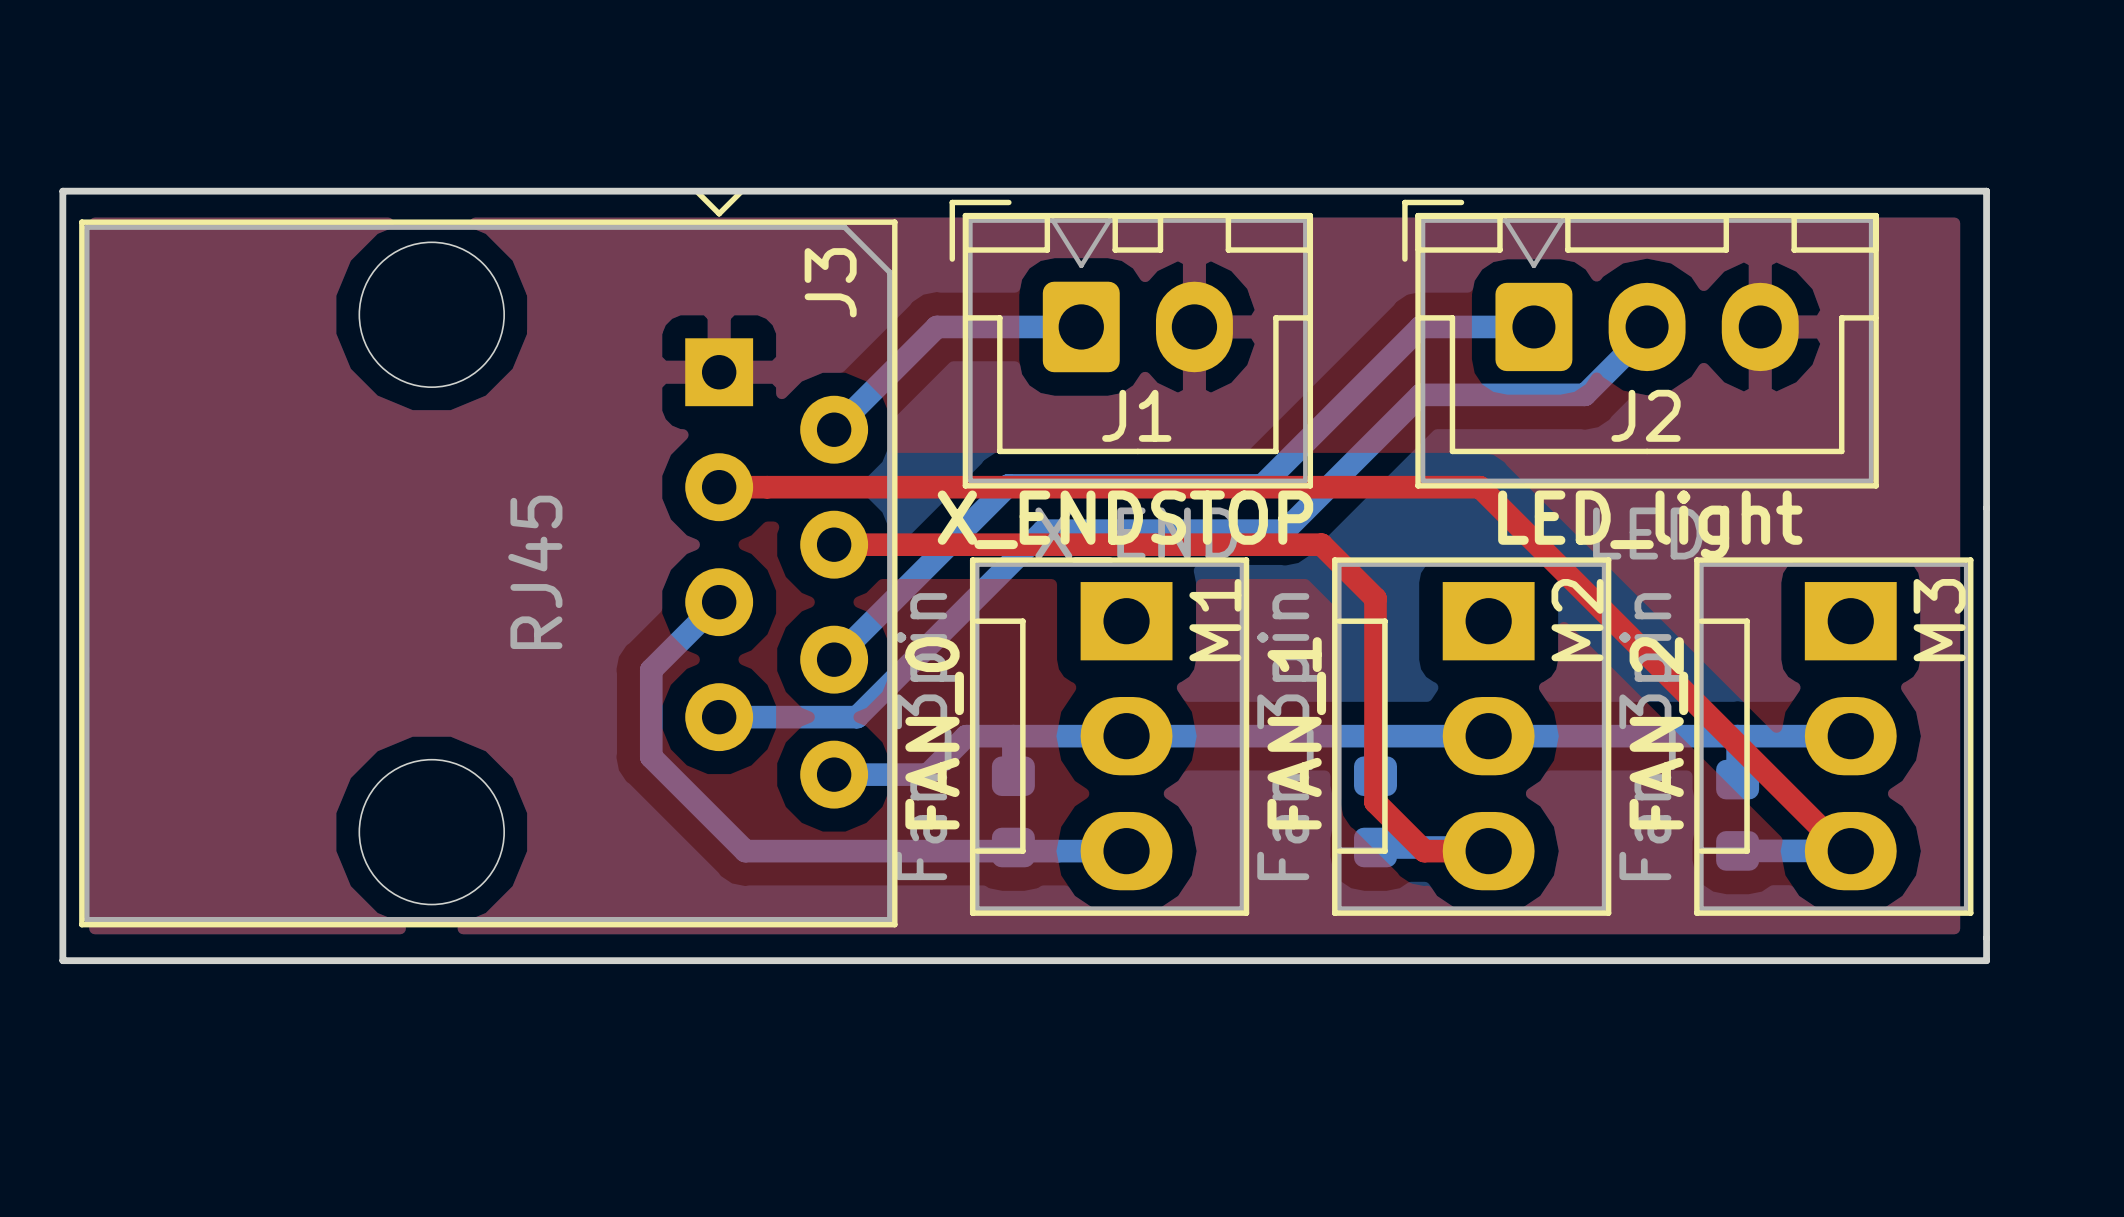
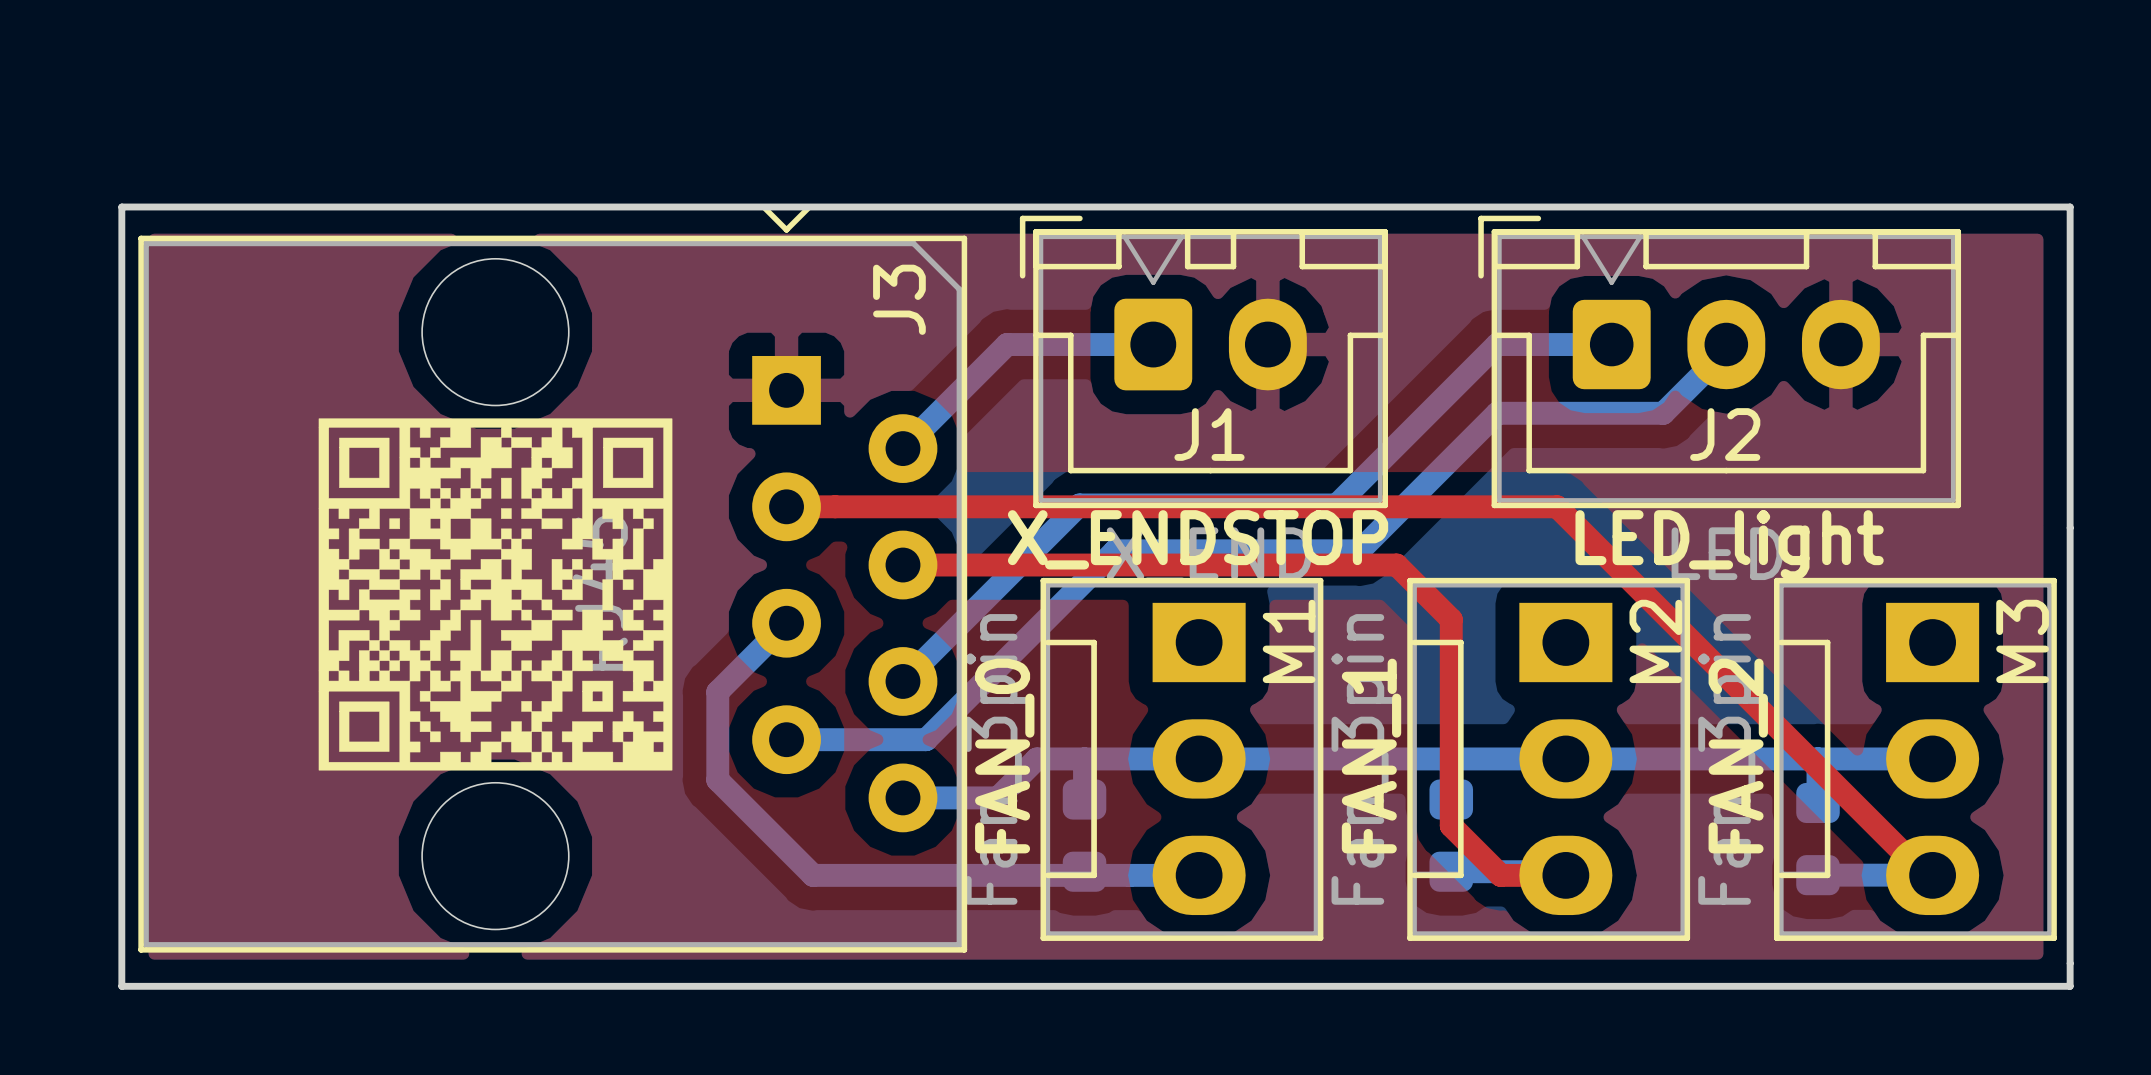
drawing: none -> [318, 418, 673, 771]

